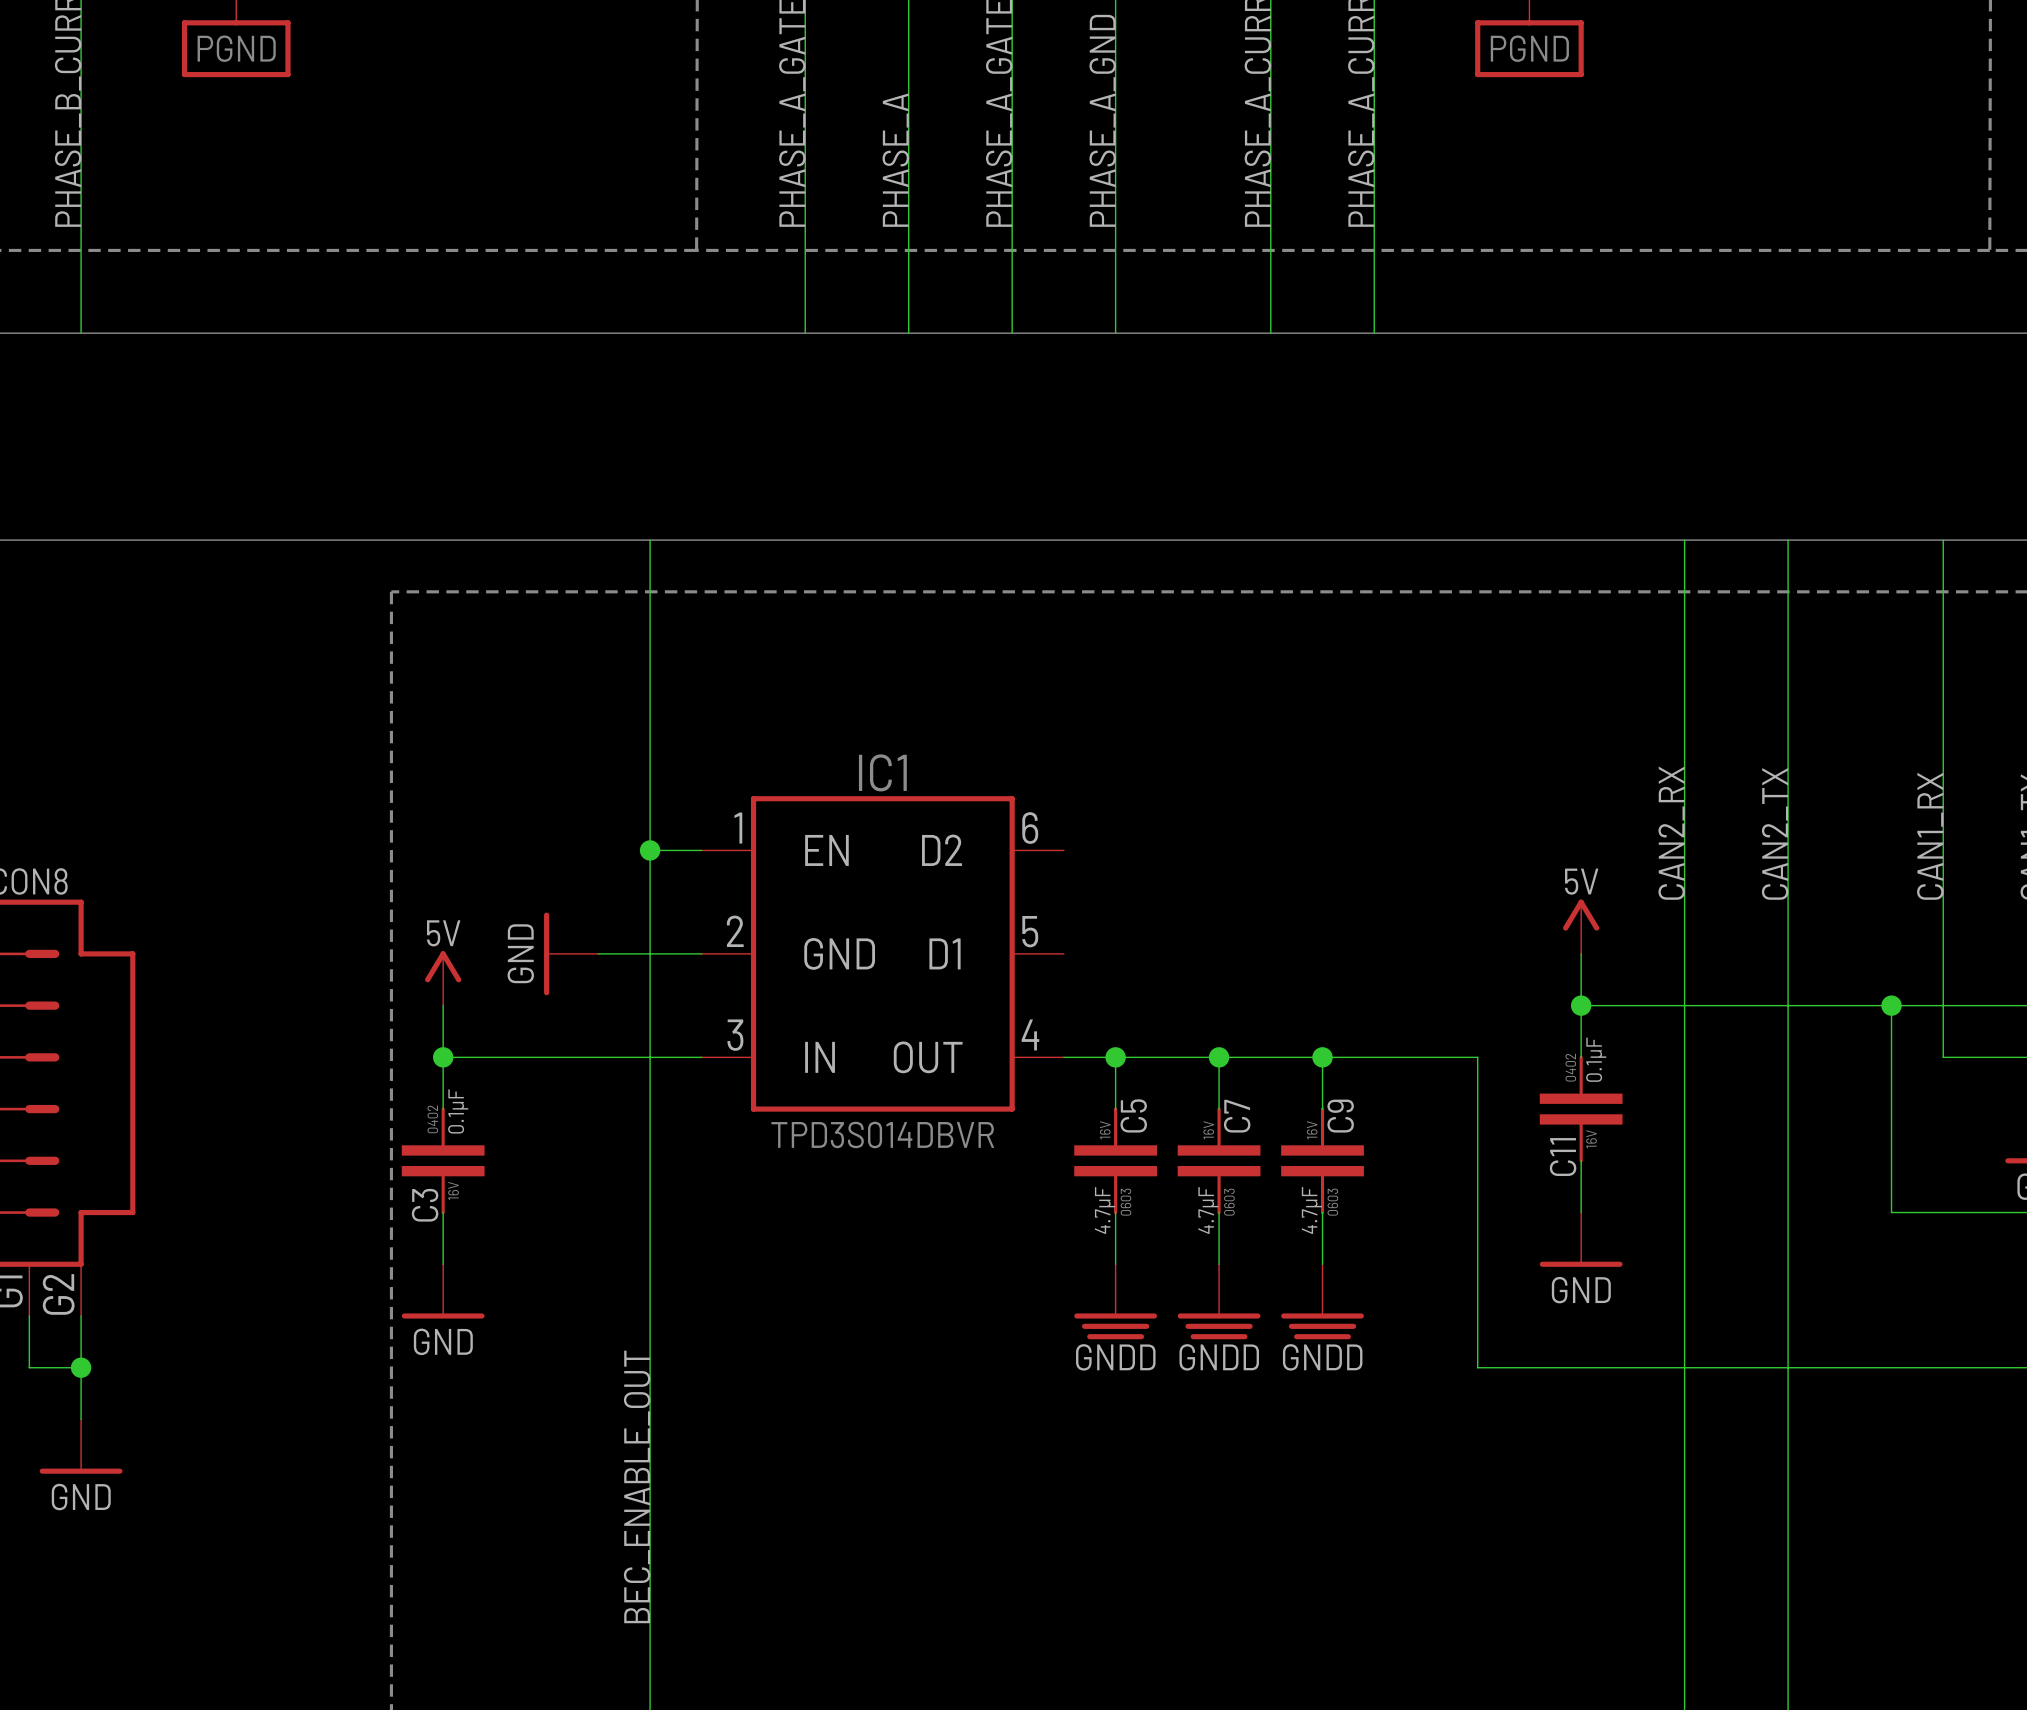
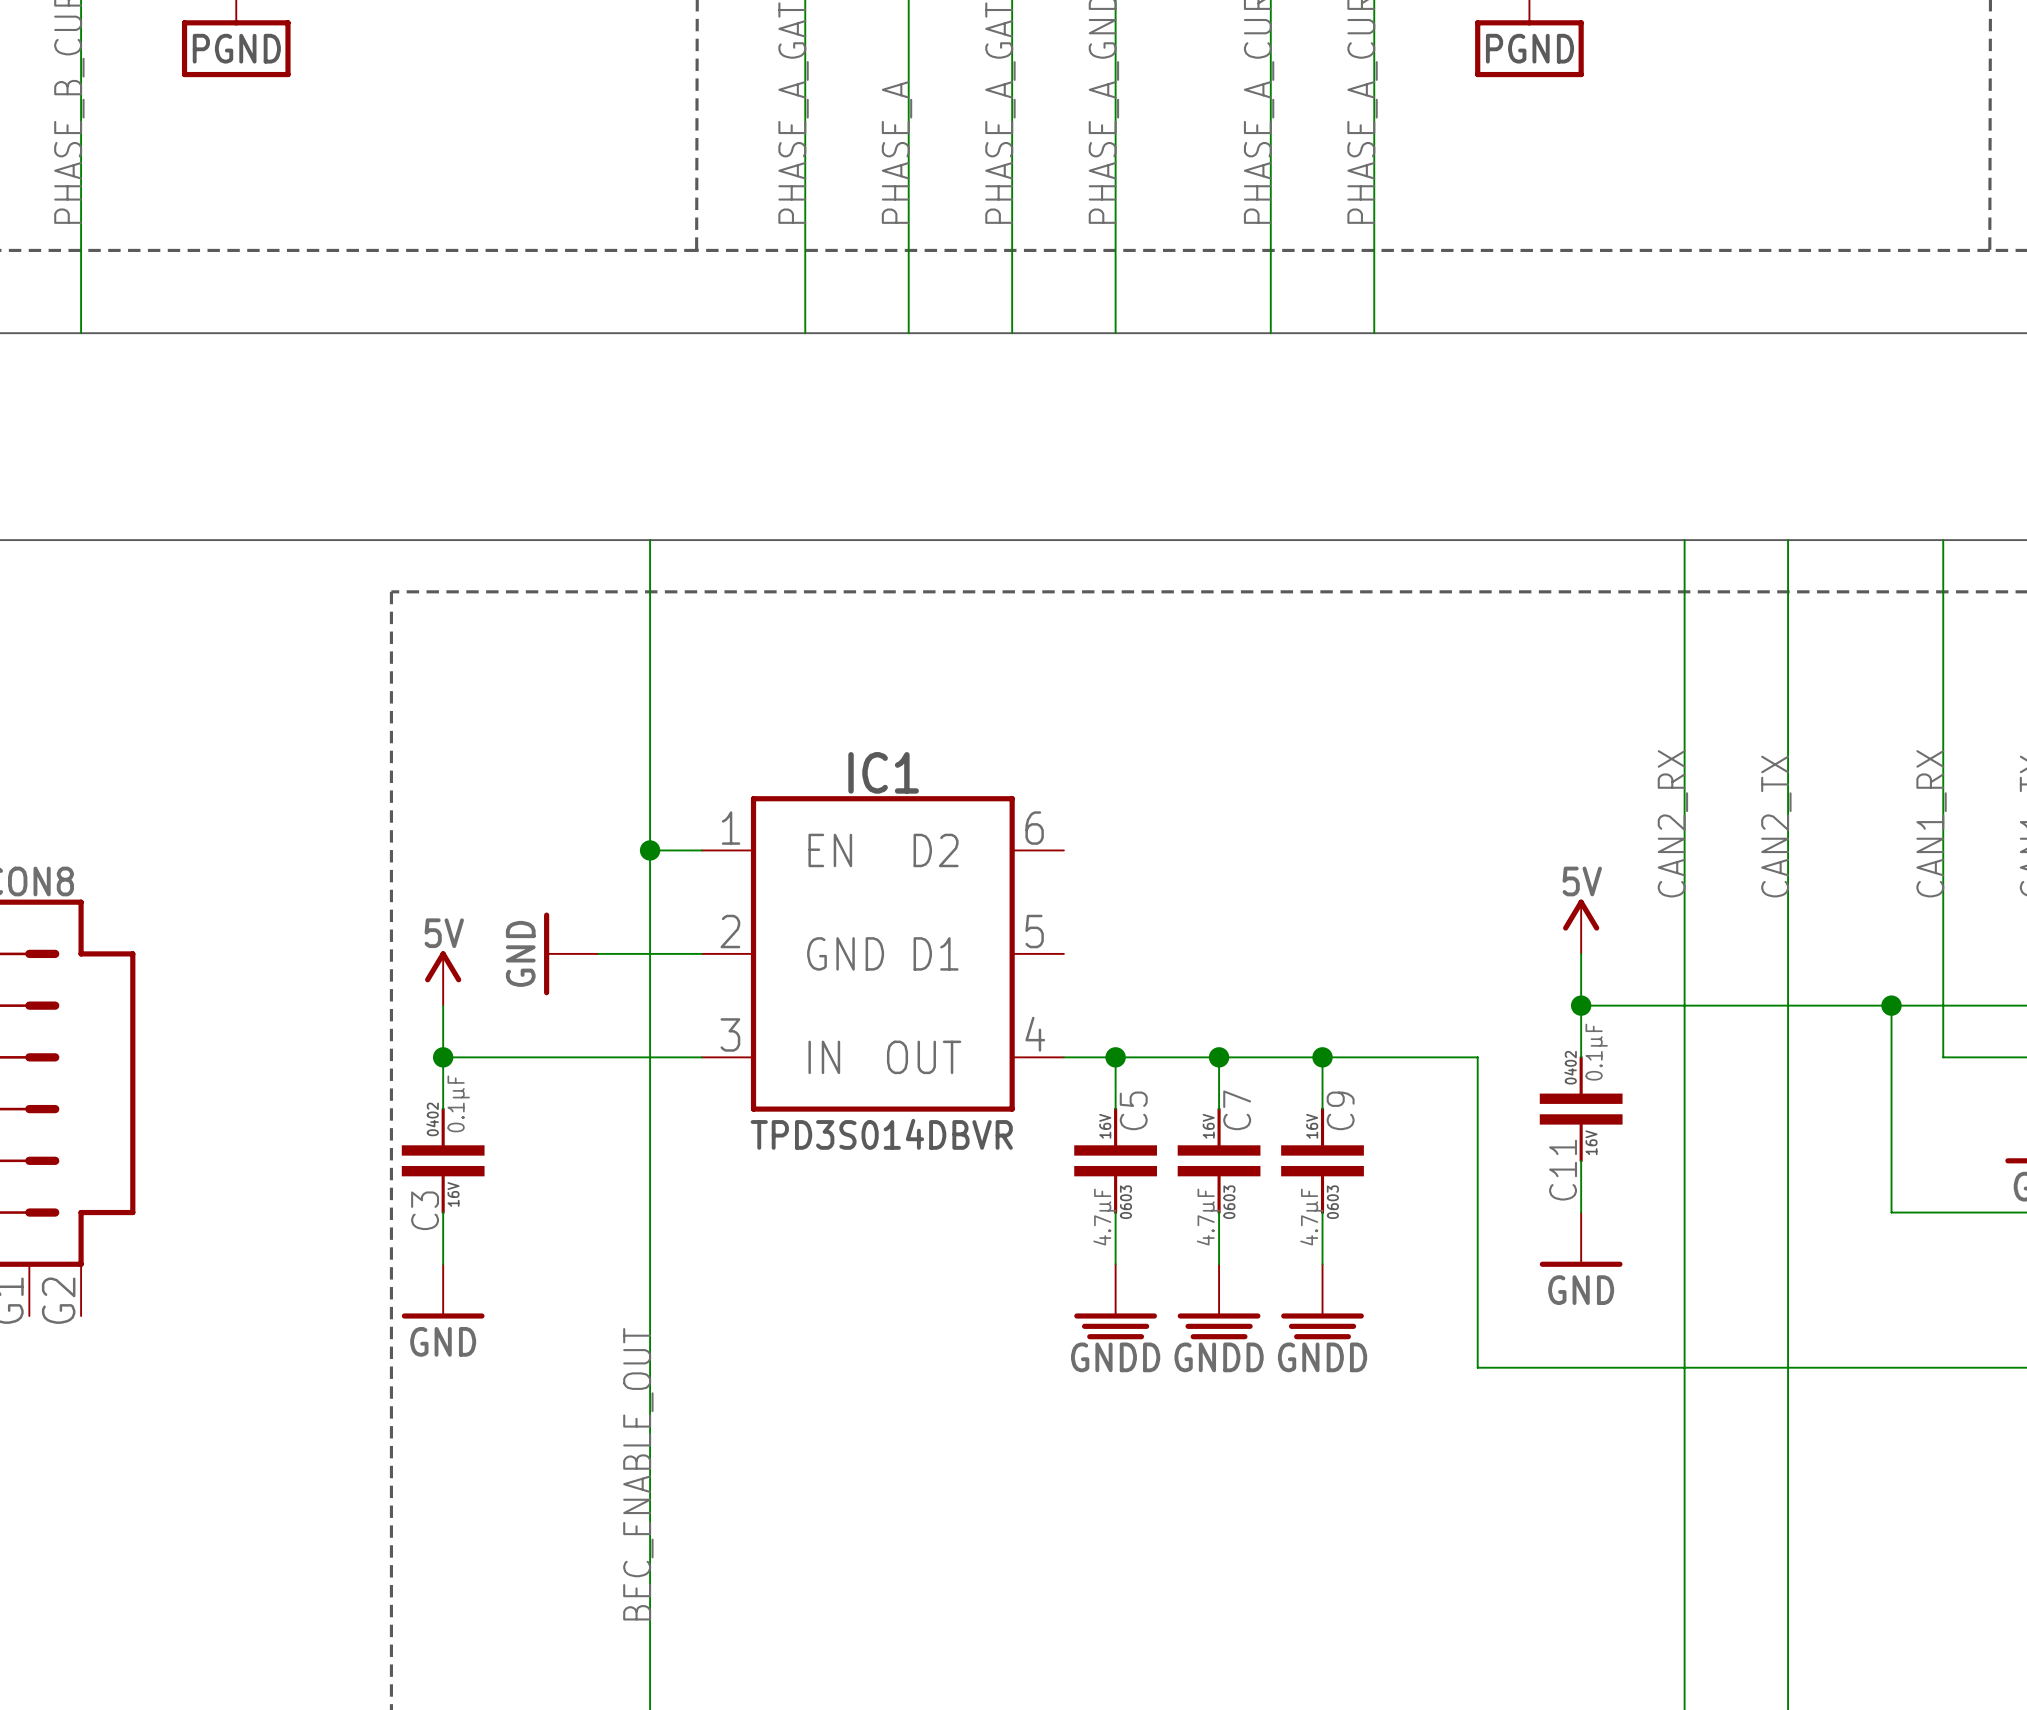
wire: (29, 1315) (29, 1367) (81, 1367) -> none
wire: (81, 1315) (81, 1419) -> none
junction: (81, 1367) -> none
power symbol: GND (81, 1446) -> none

